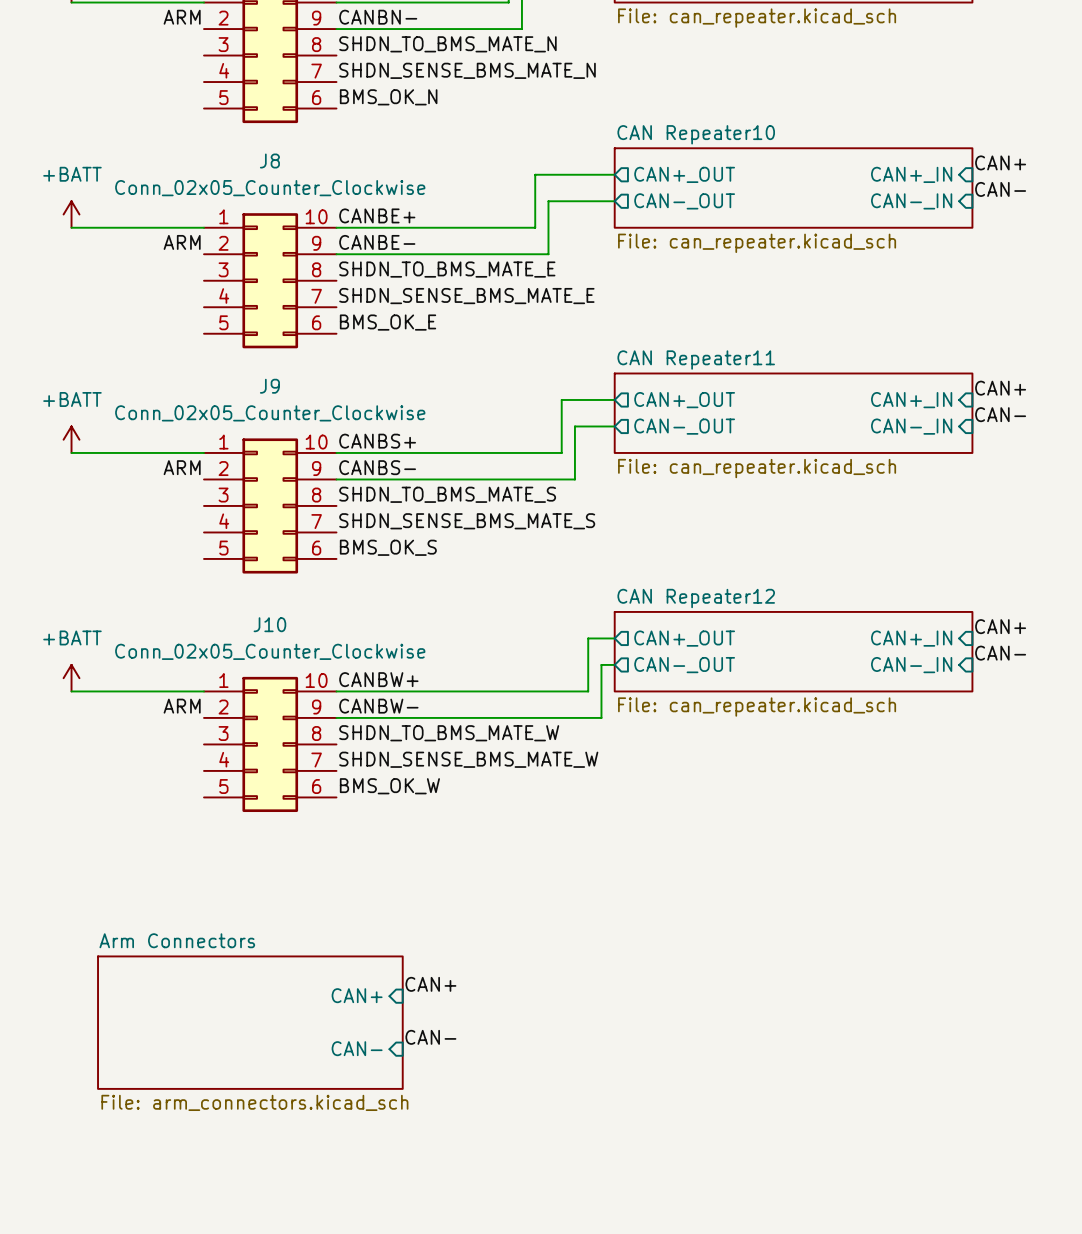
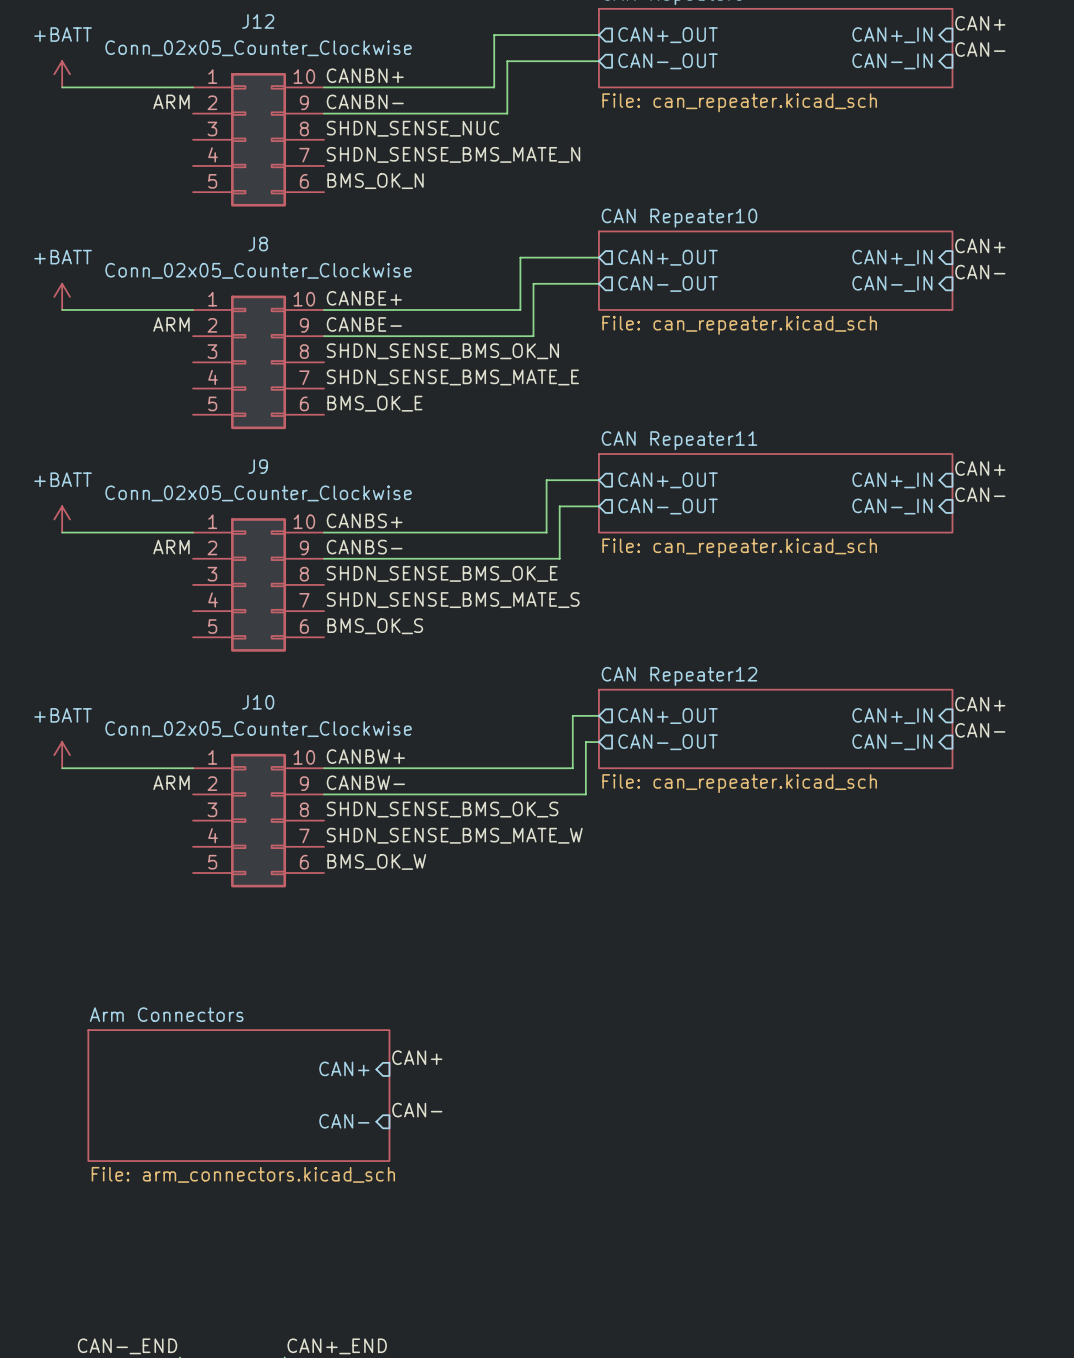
label: SHDN_TO_BMS_MATE_N (447, 44) -> SHDN_SENSE_NUC (412, 128)
label: SHDN_TO_BMS_MATE_E (447, 269) -> SHDN_SENSE_BMS_OK_N (442, 351)
label: SHDN_TO_BMS_MATE_S (447, 494) -> SHDN_SENSE_BMS_OK_E (442, 573)
label: SHDN_TO_BMS_MATE_W (449, 733) -> SHDN_SENSE_BMS_OK_S (442, 809)

